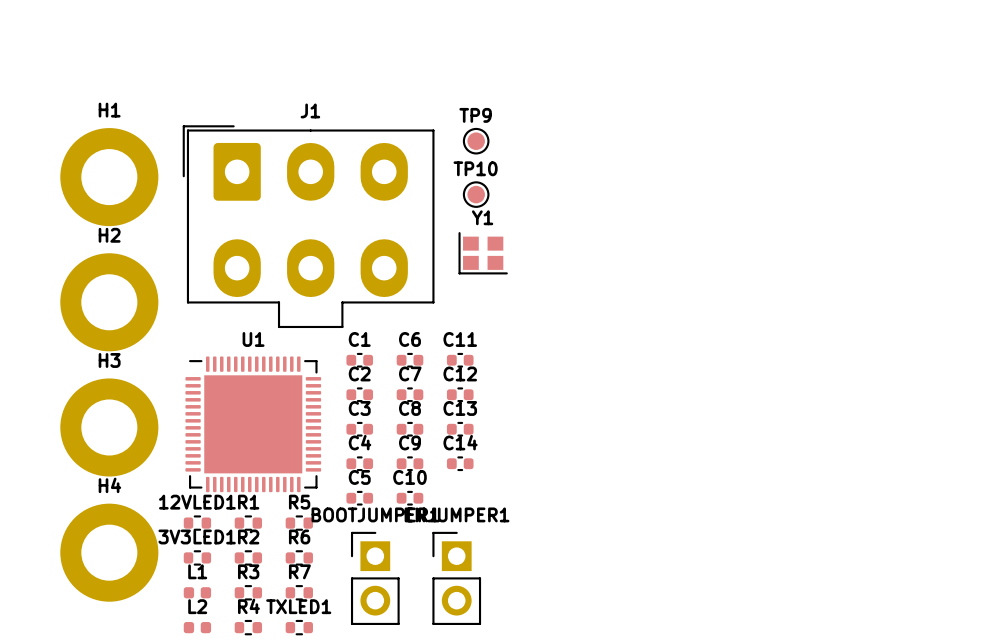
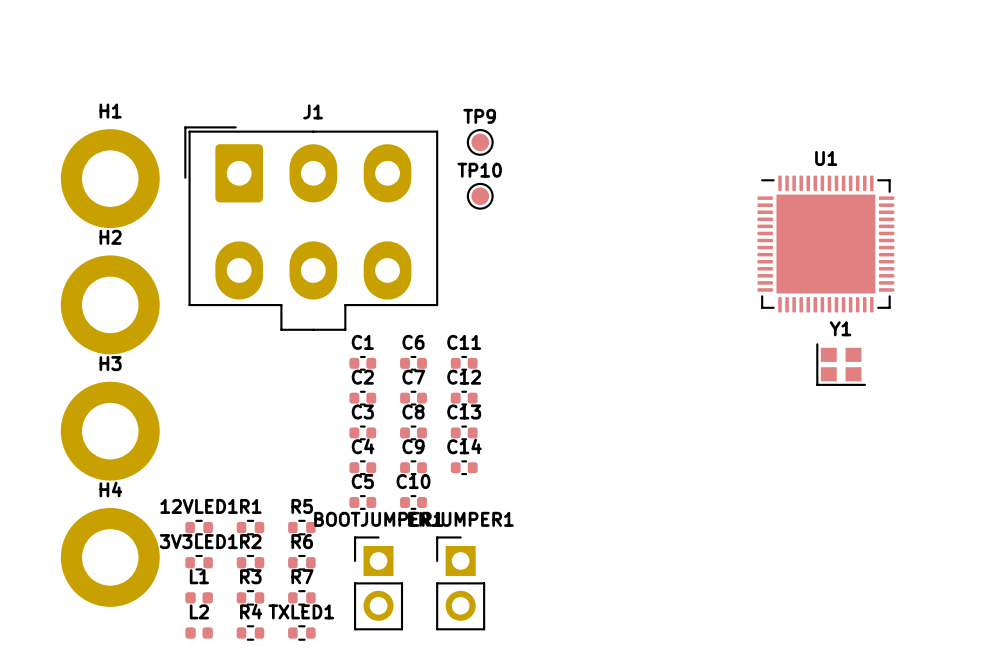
Y1 position: (483, 253) -> (841, 364)
U1 position: (253, 424) -> (825, 244)

